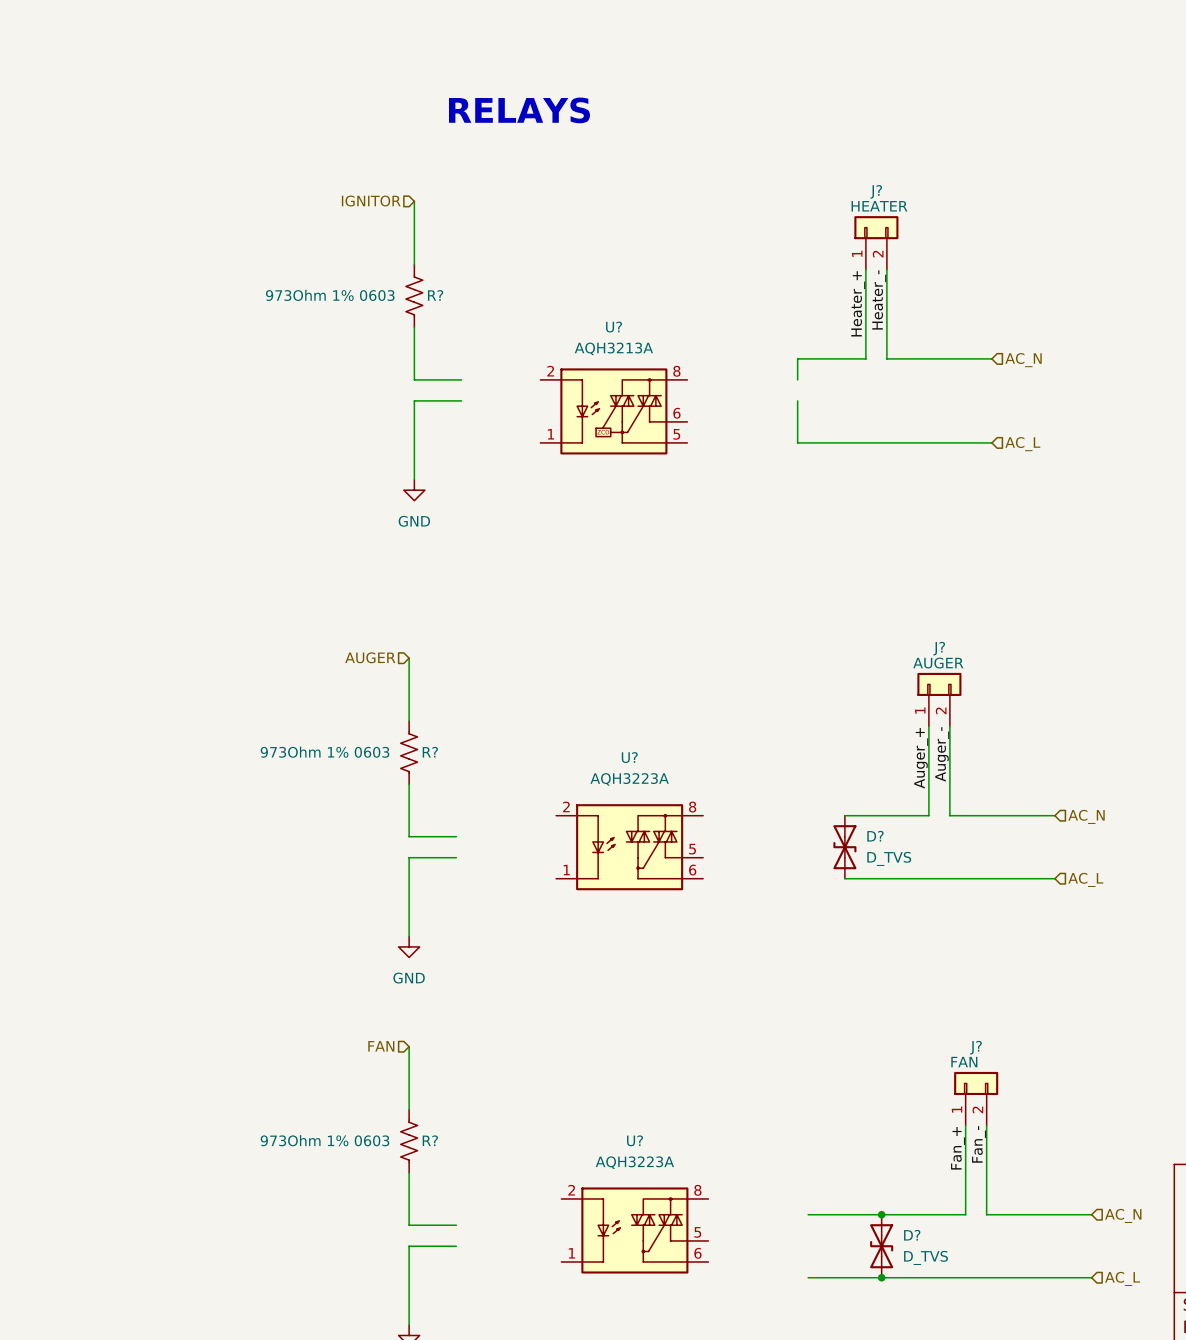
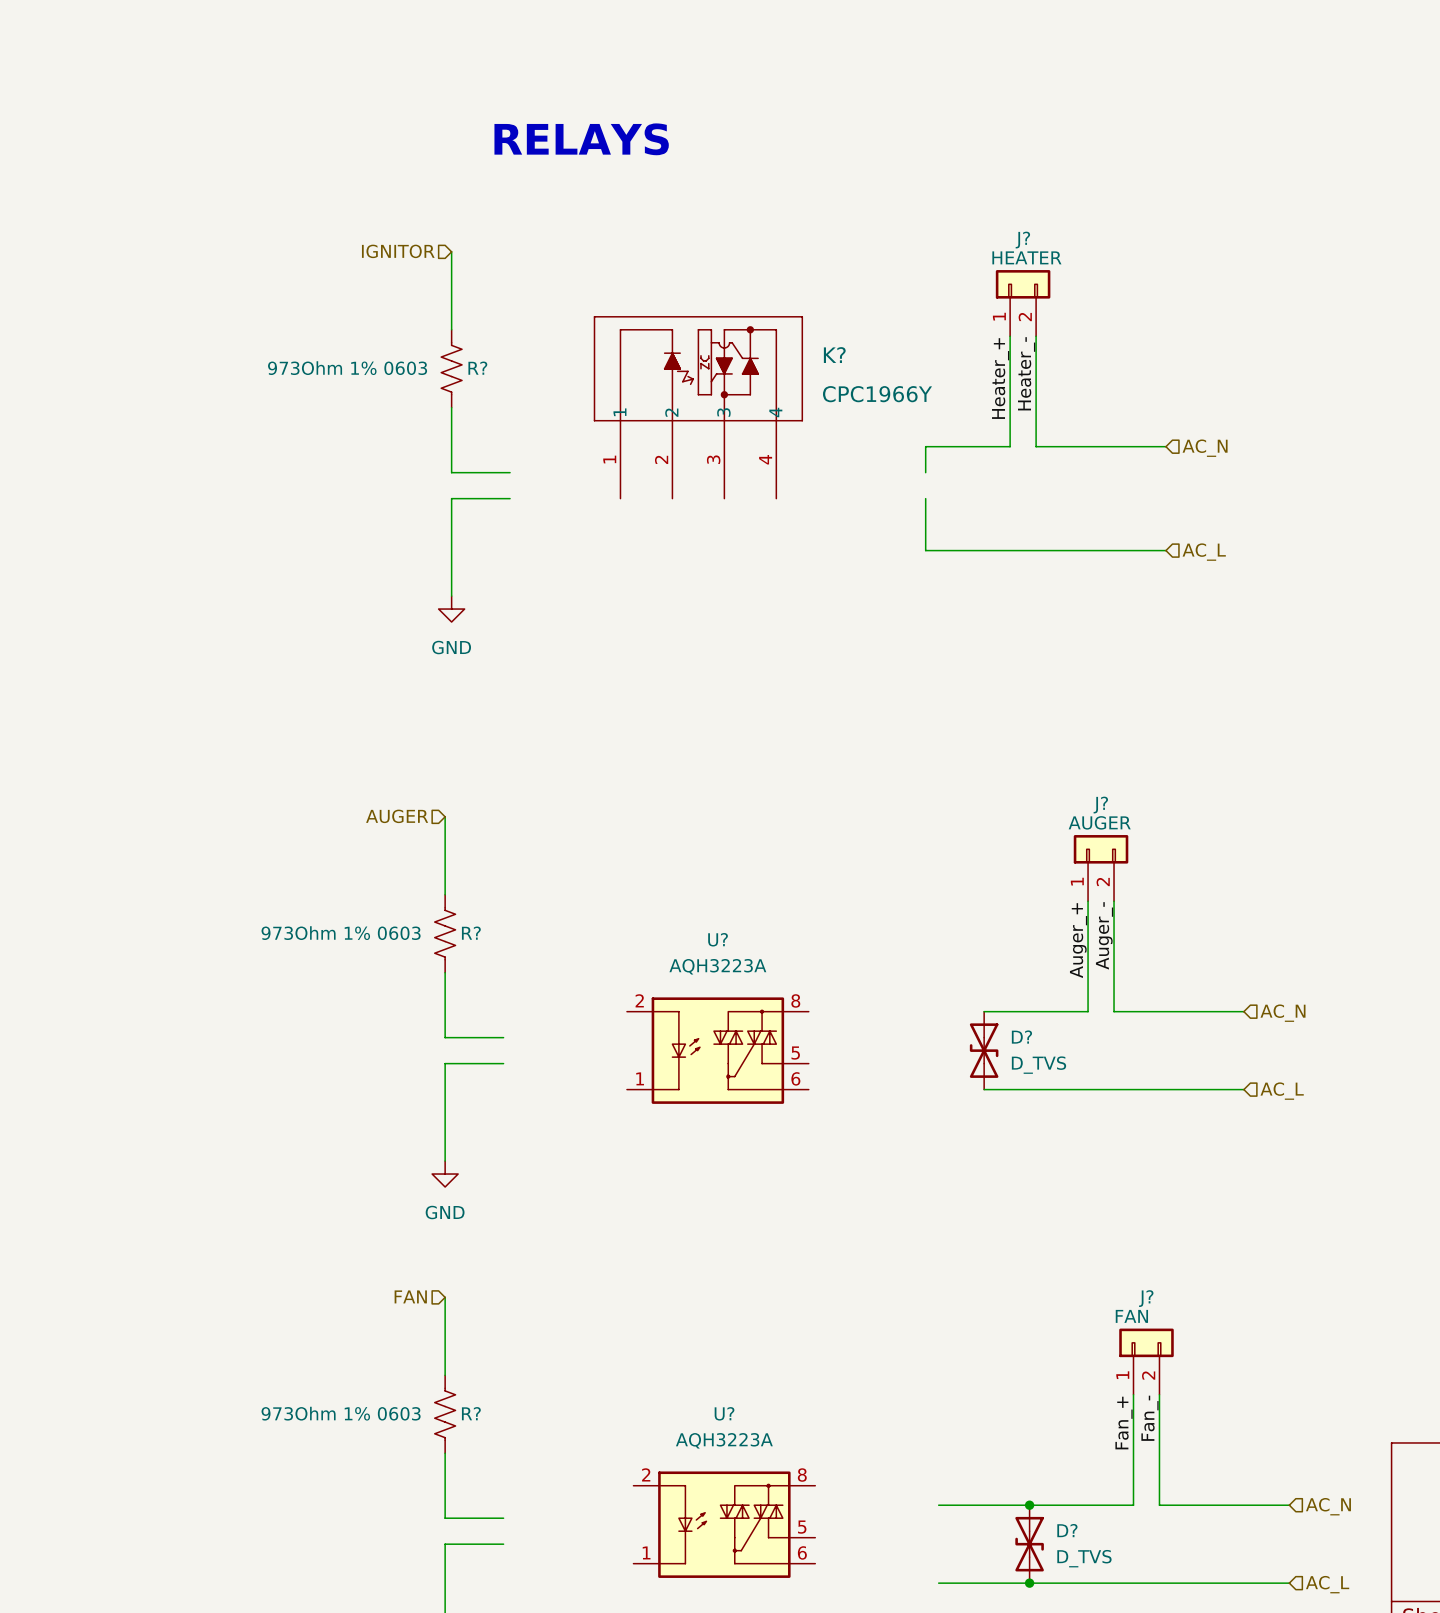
K?: none -> CPC1966Y (698, 407)
U?: AQH3213A (613, 411) -> none

